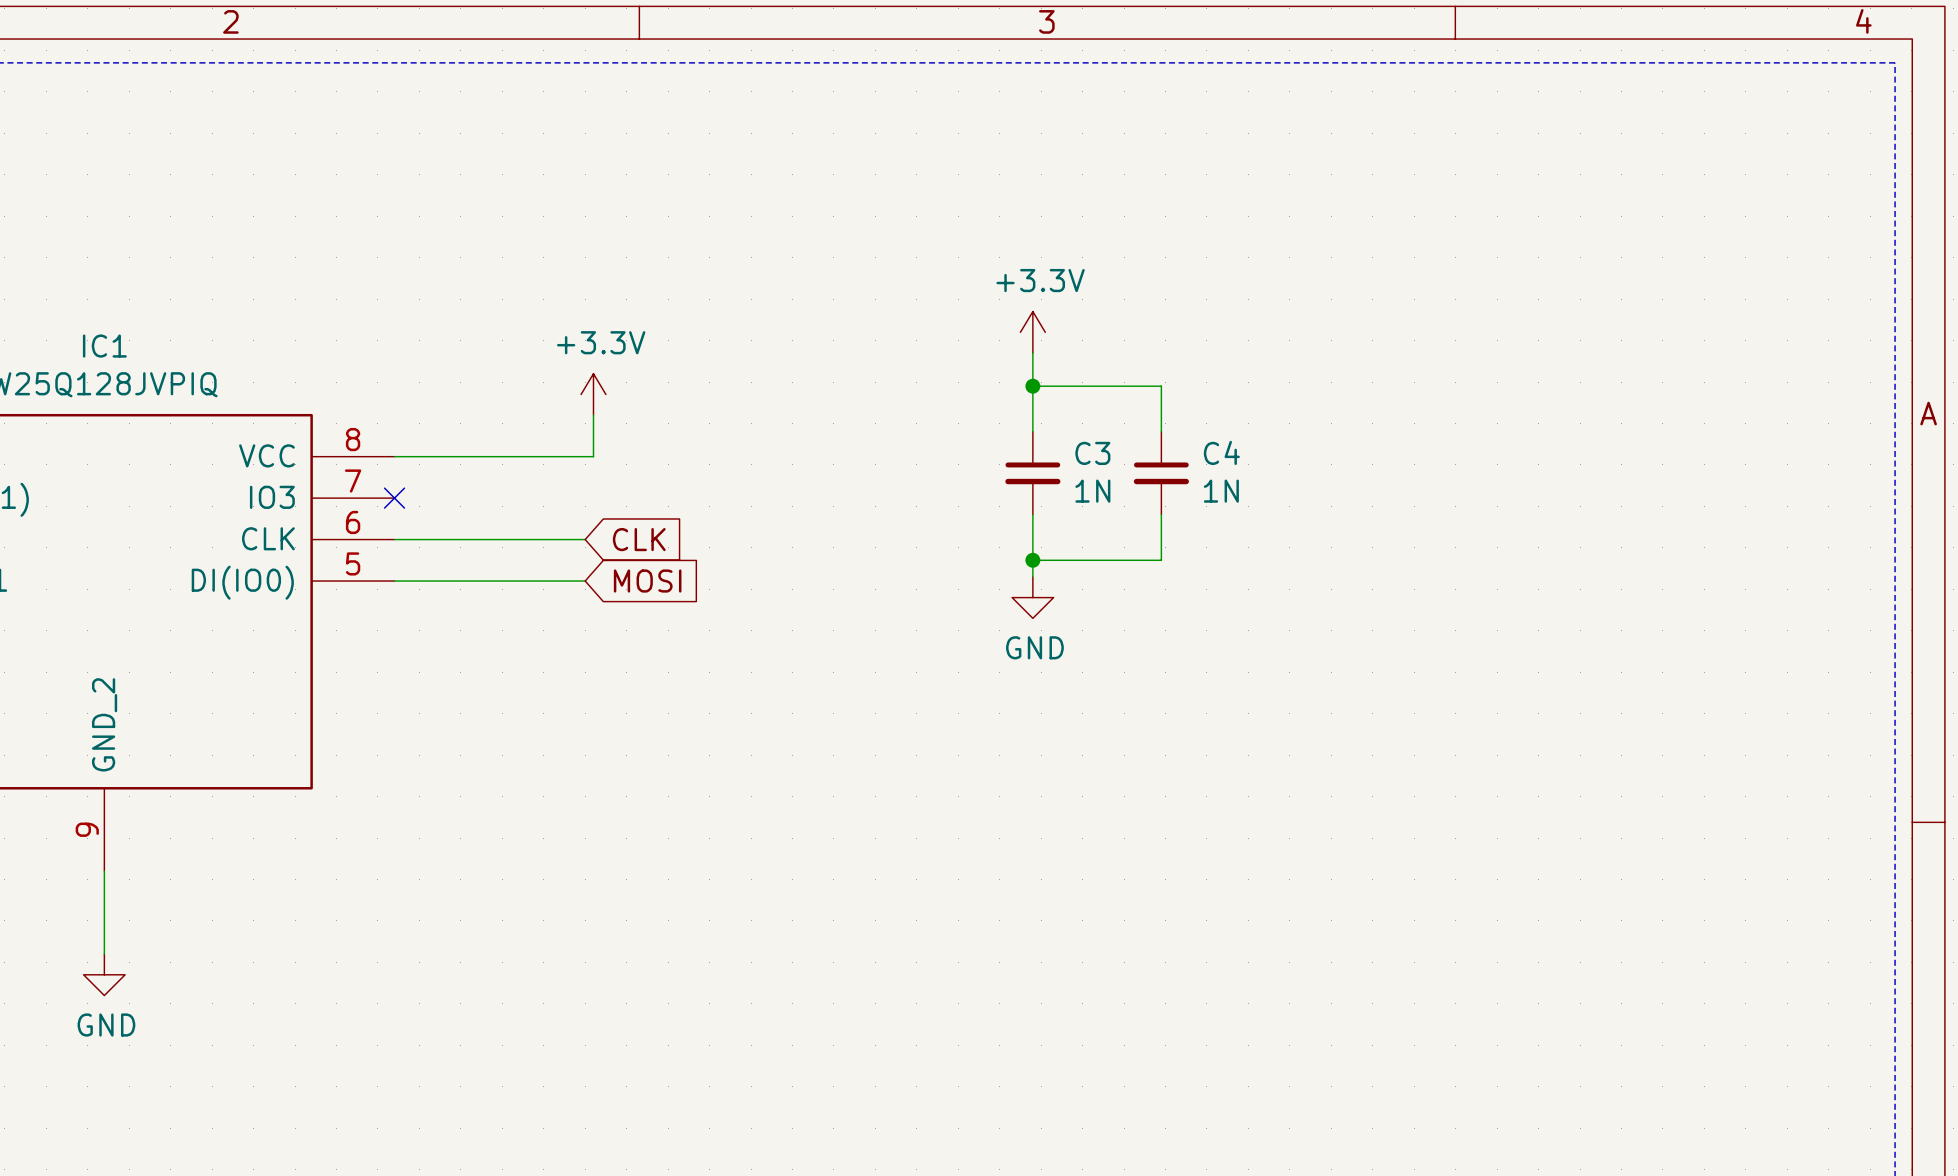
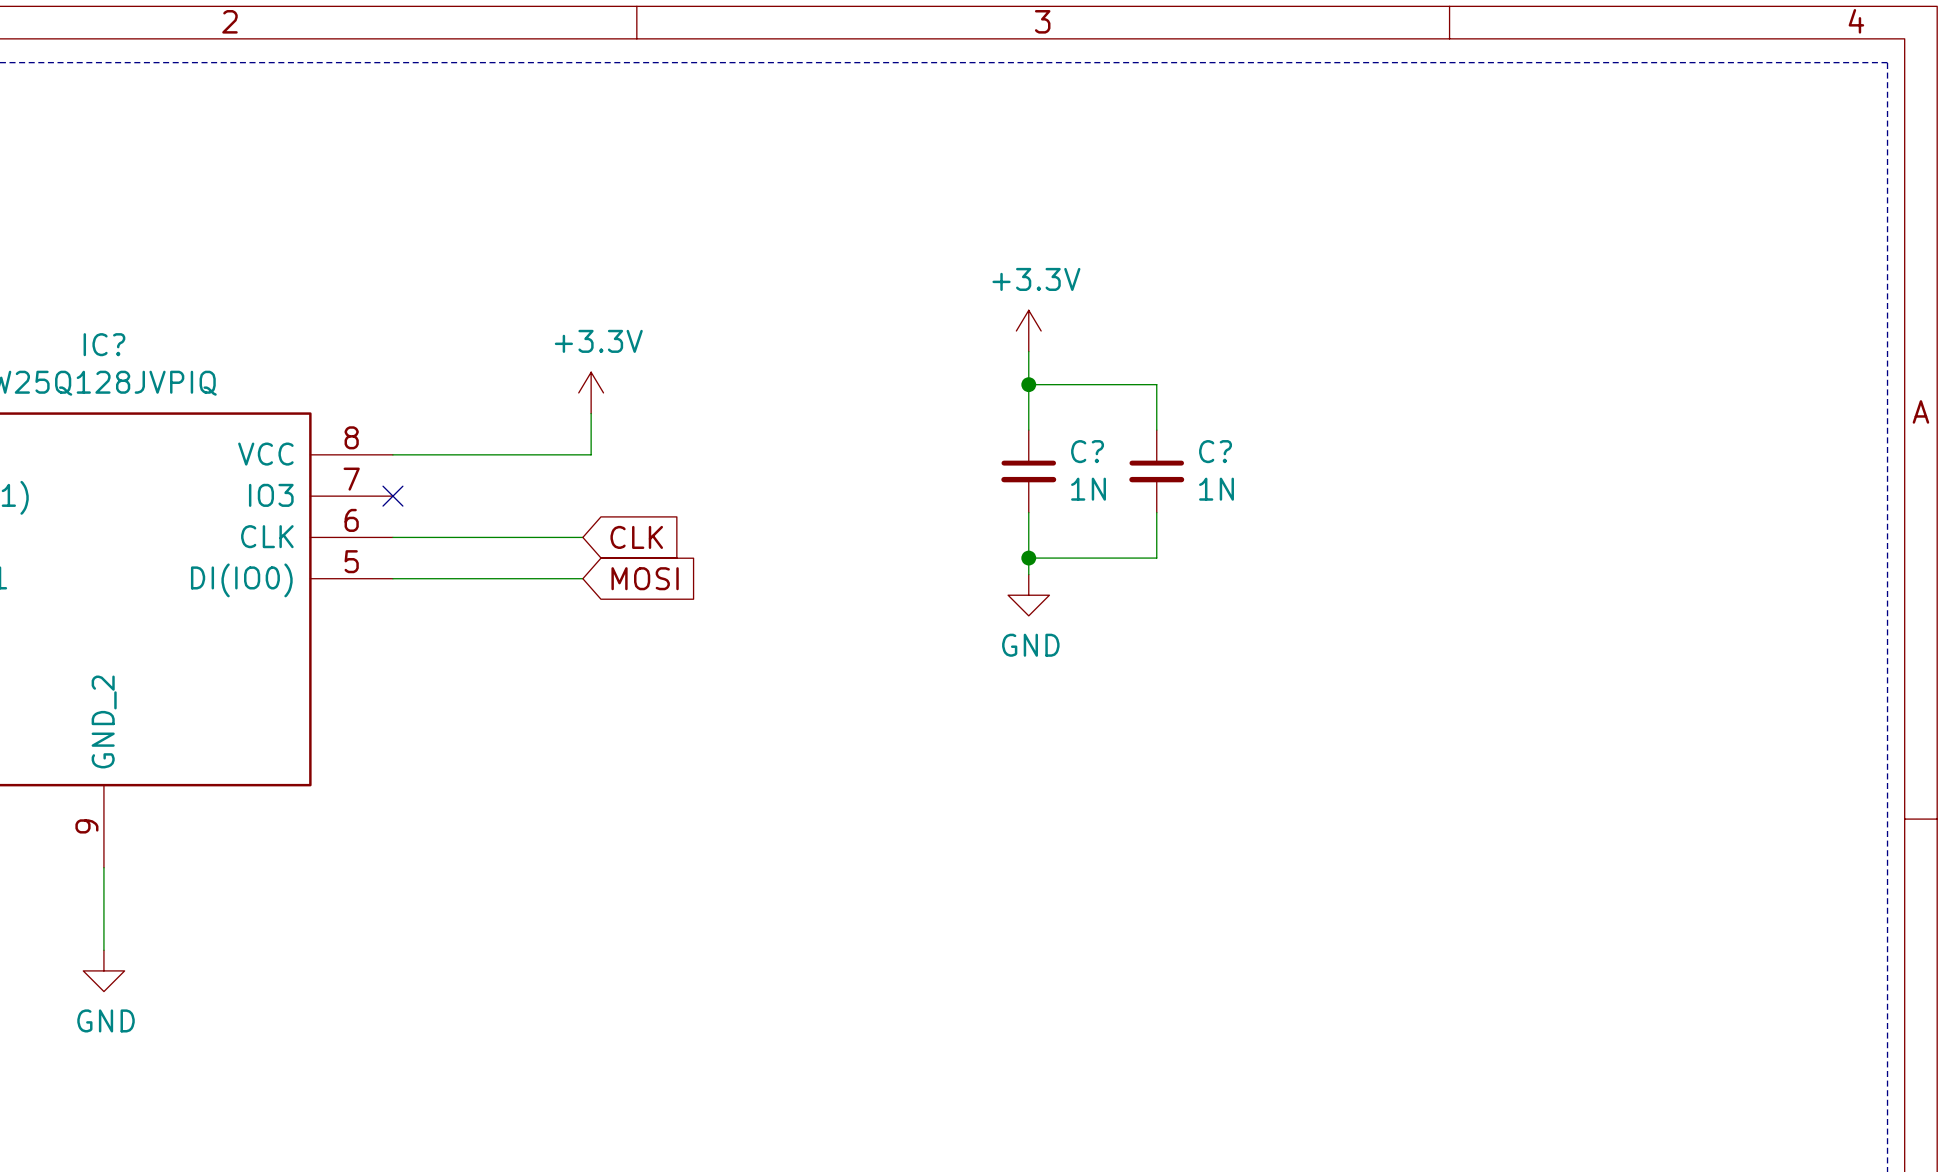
IC1 name: IC1 (104, 346) -> IC? (104, 344)
C4 name: C4 (1221, 452) -> C? (1215, 451)
C3 name: C3 (1092, 453) -> C? (1087, 451)

